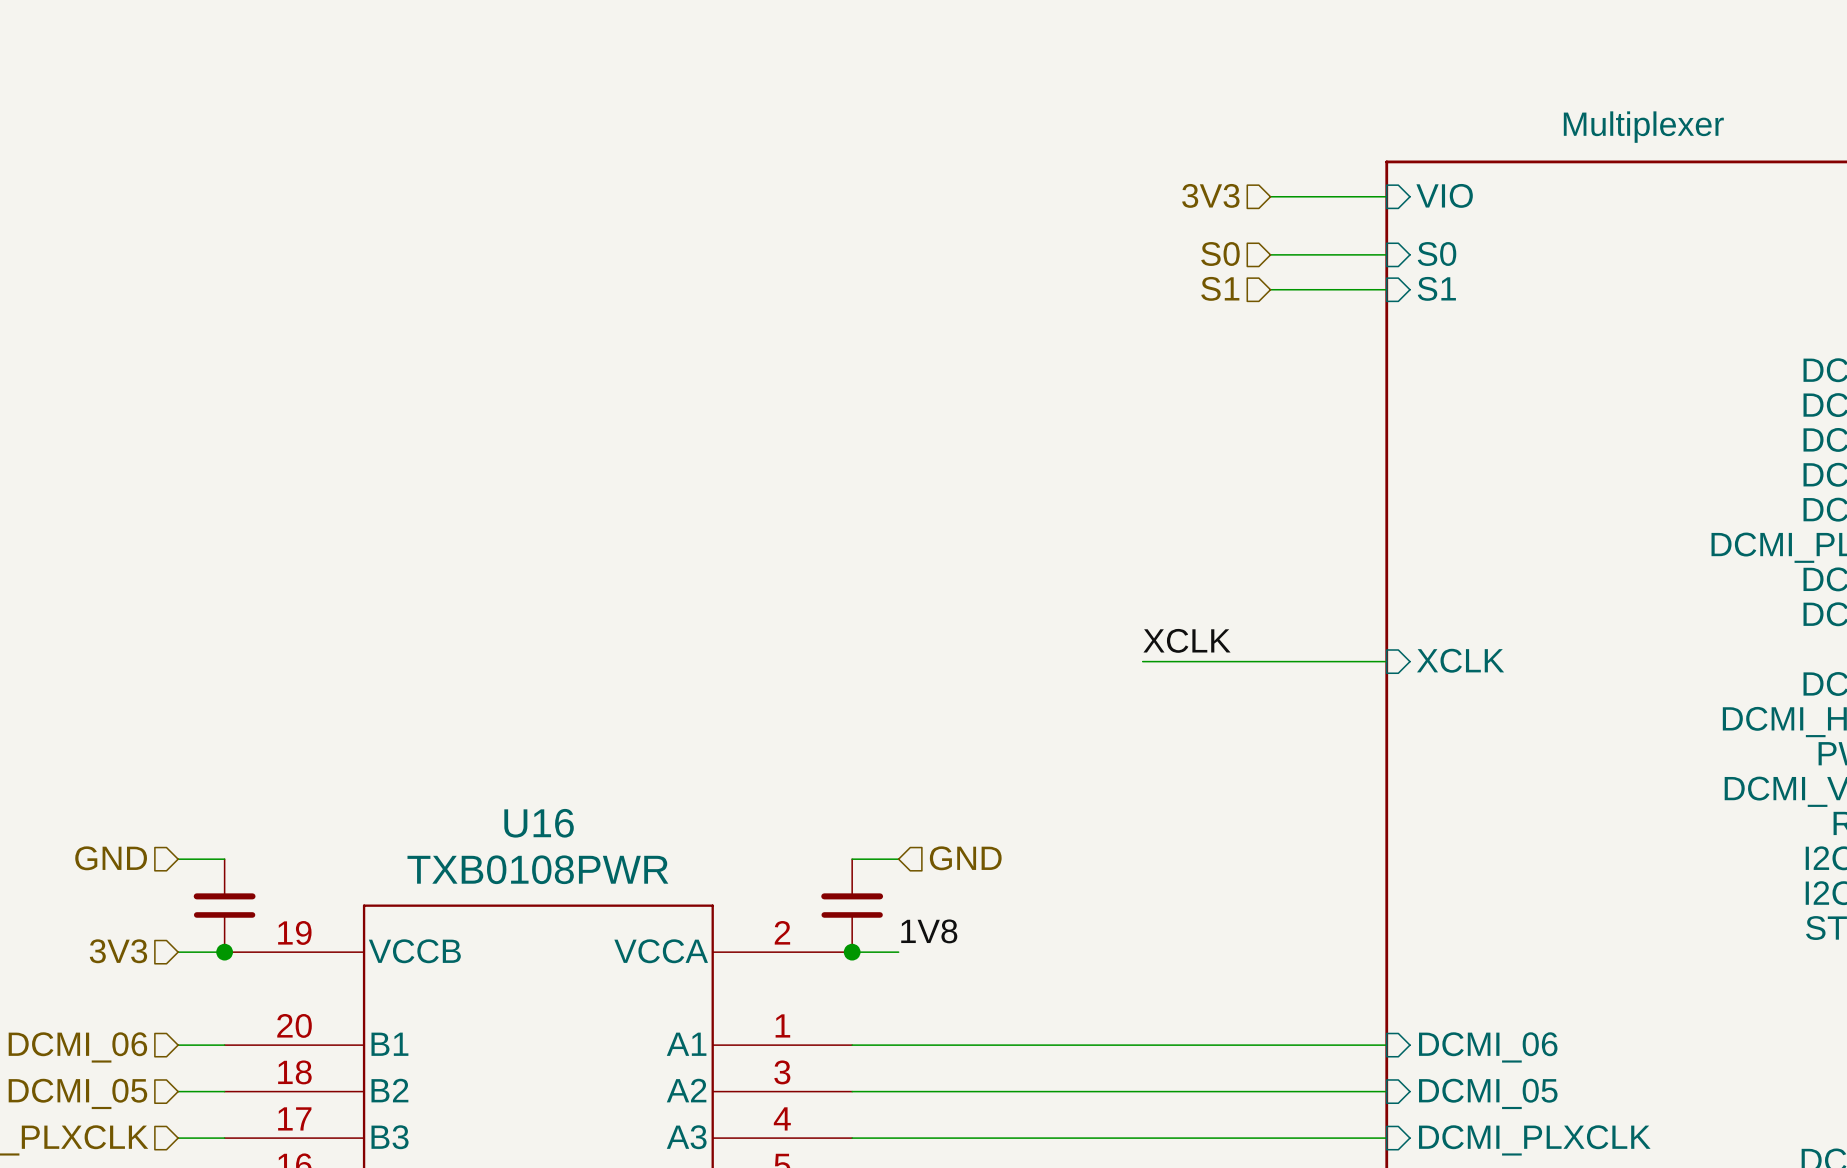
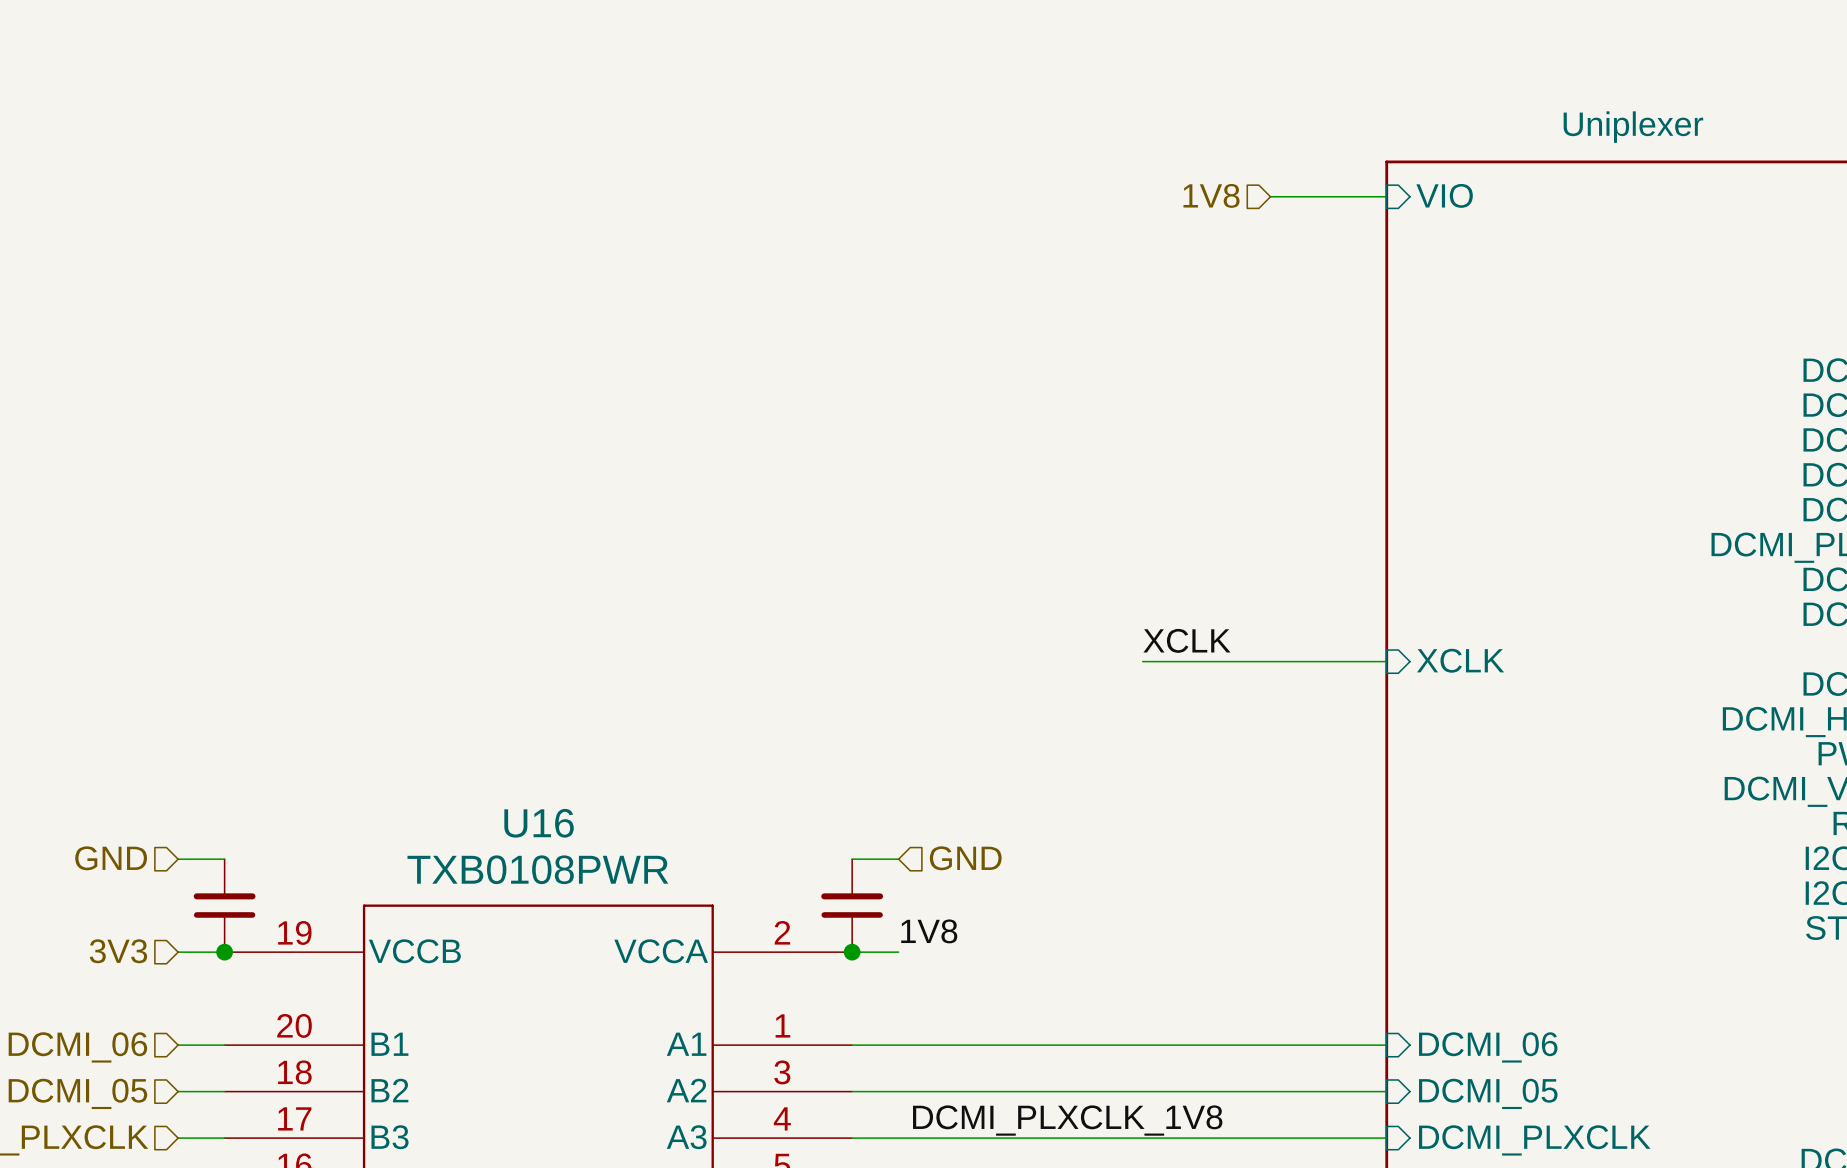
sheet Multiplexer name: Multiplexer (1643, 127) -> Uniplexer (1633, 127)
hierarchical label: 3V3 (1210, 195) -> 1V8 (1211, 195)
hierarchical label: S0 (1220, 254) -> none
wire: (1270, 254) (1386, 254) -> none
sheet pin: S0 (1437, 254) -> none
hierarchical label: S1 (1220, 288) -> none
sheet pin: S1 (1436, 288) -> none
wire: (1270, 289) (1386, 289) -> none
label: none -> DCMI_PLXCLK_1V8 (1067, 1120)

